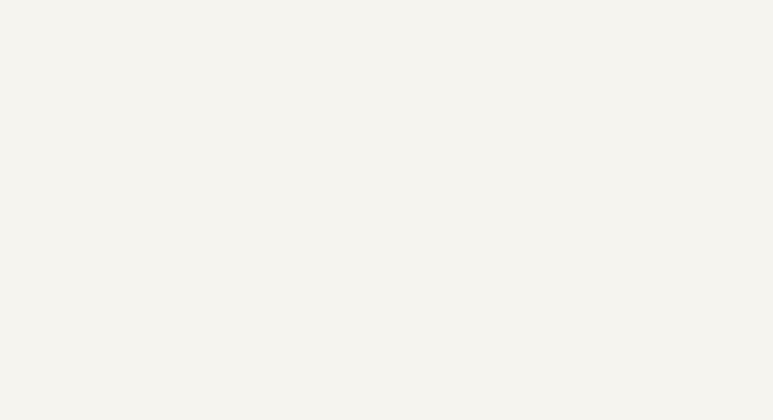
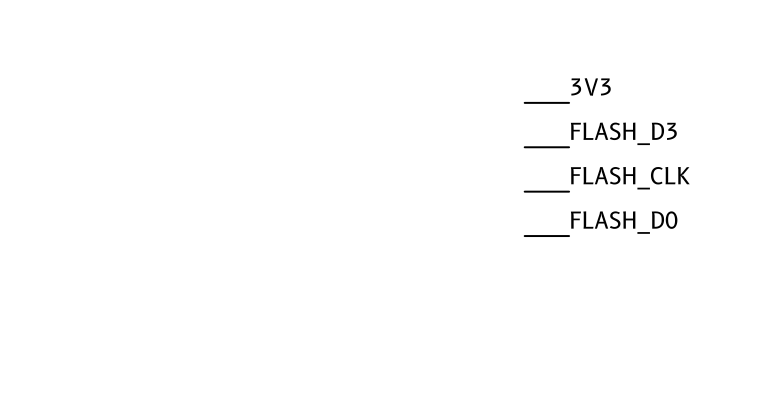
label: none -> 3V3 (591, 86)
wire: none -> (524, 102) (569, 102)
label: none -> FLASH_D3 (623, 133)
wire: none -> (524, 147) (569, 147)
label: none -> FLASH_CLK (630, 178)
wire: none -> (524, 191) (569, 191)
label: none -> FLASH_D0 (624, 222)
wire: none -> (524, 236) (569, 236)

